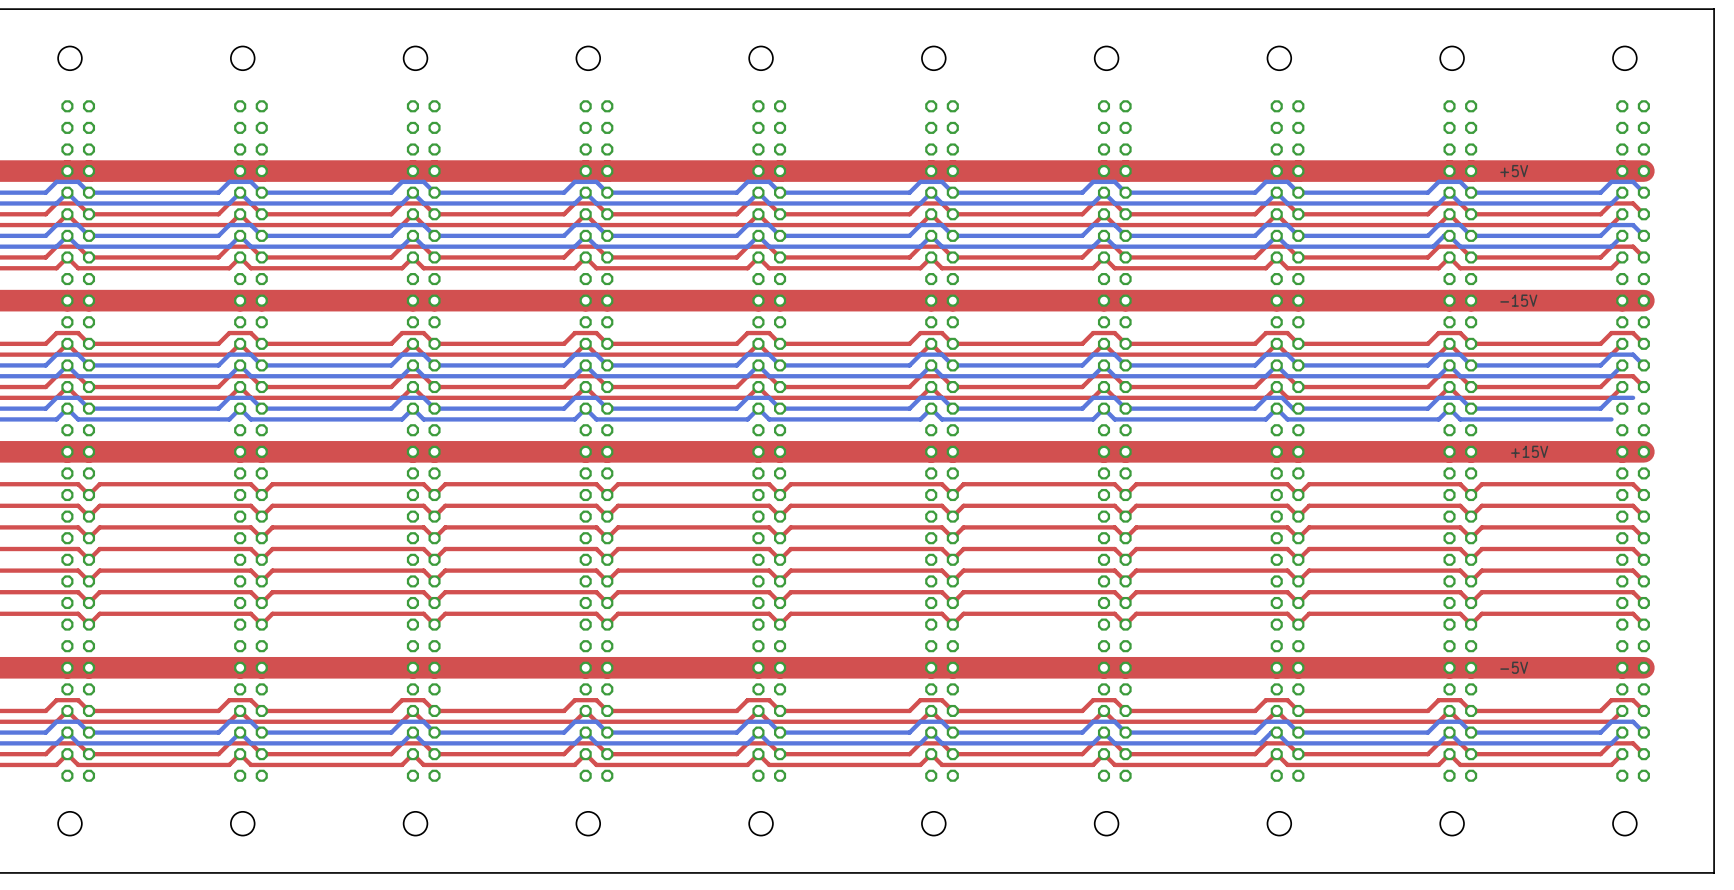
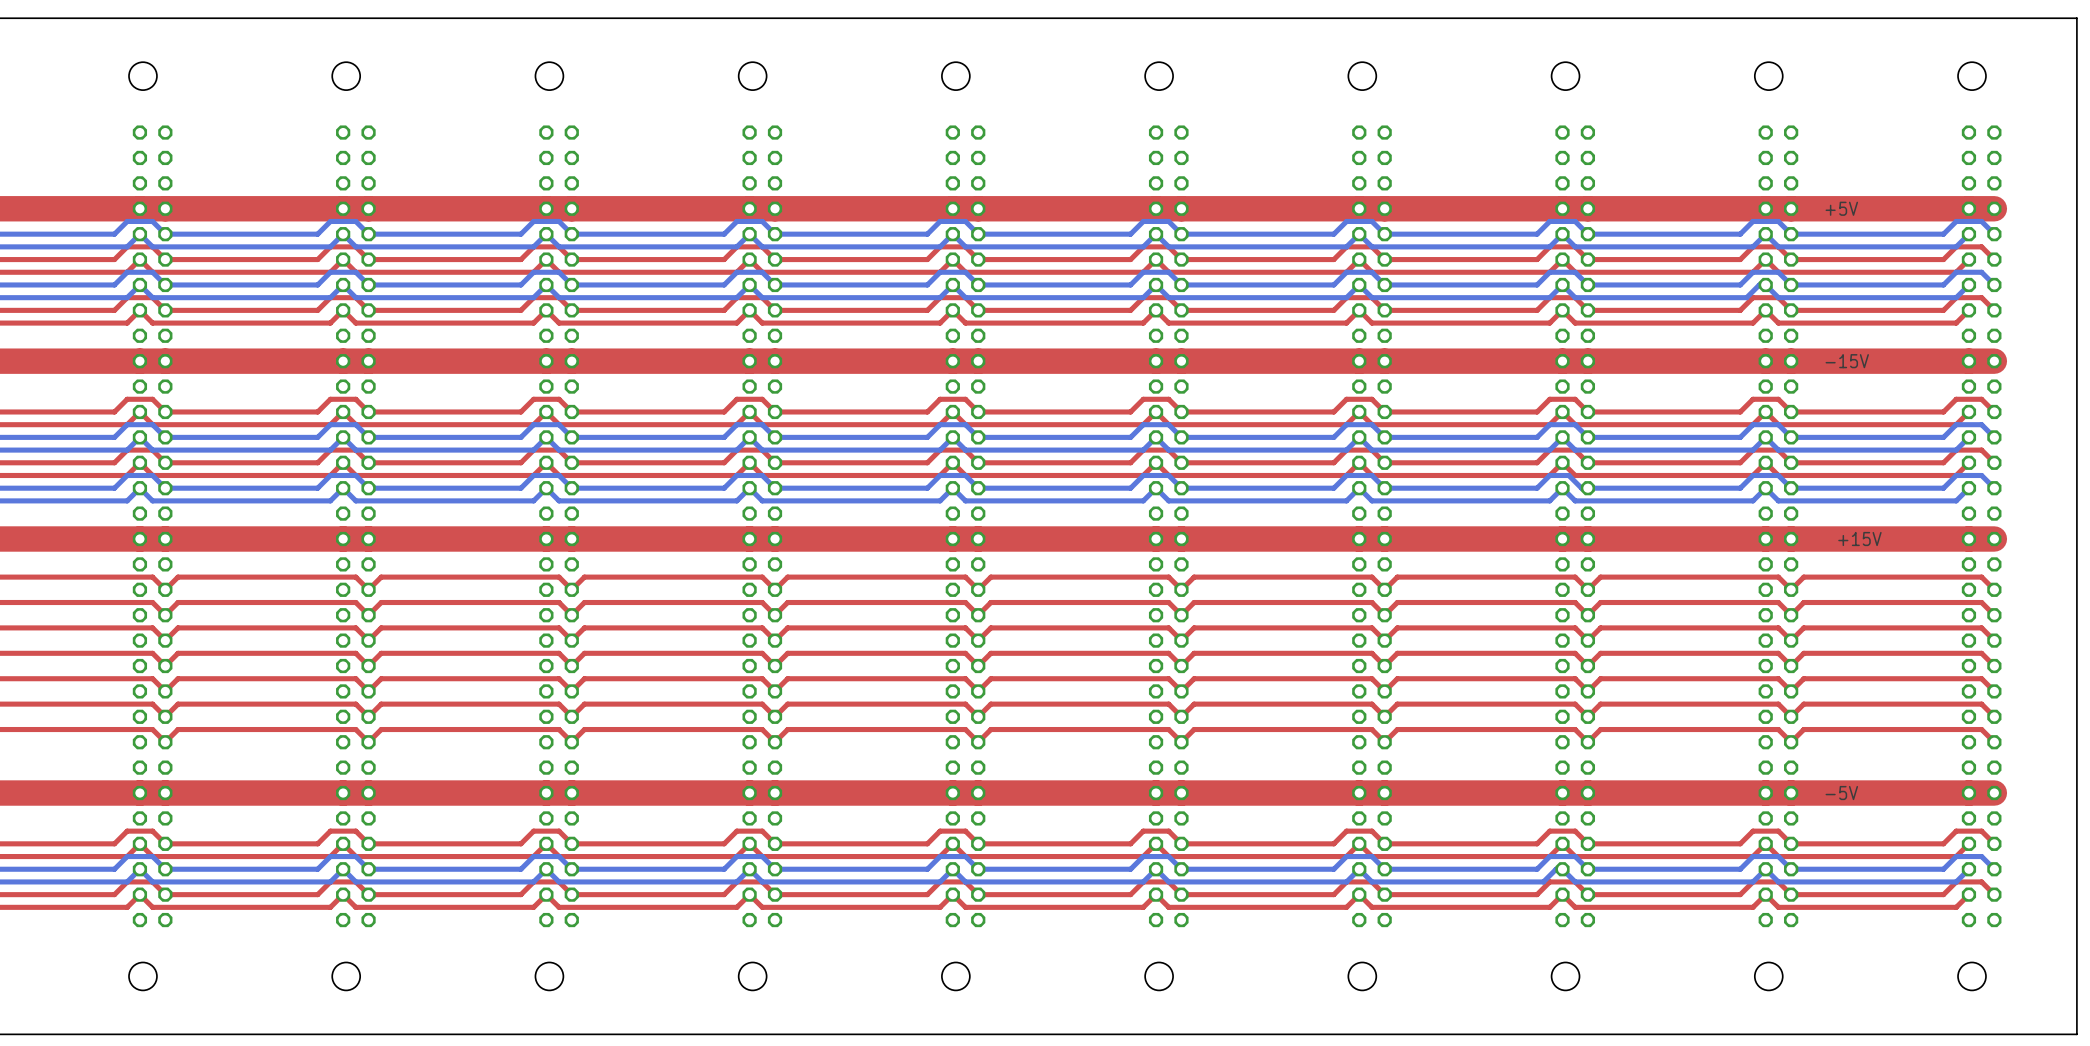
bottom track: none -> (1981, 475) (1994, 488)
bottom track: none -> (1968, 488) (1956, 500)

